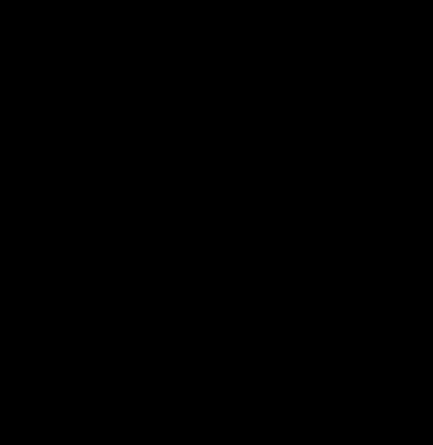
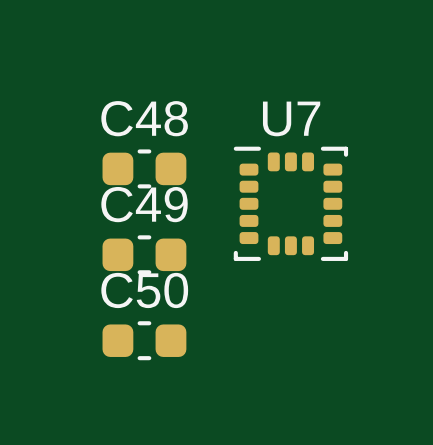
C48: none -> (144, 168)
U7: none -> (290, 203)
C49: none -> (144, 254)
C50: none -> (144, 340)

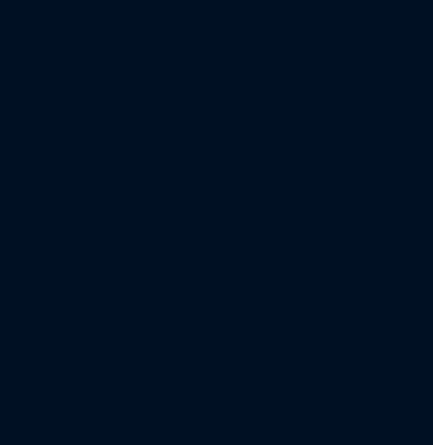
C48: (144, 168) -> none
U7: (290, 203) -> none
C49: (144, 254) -> none
C50: (144, 340) -> none

